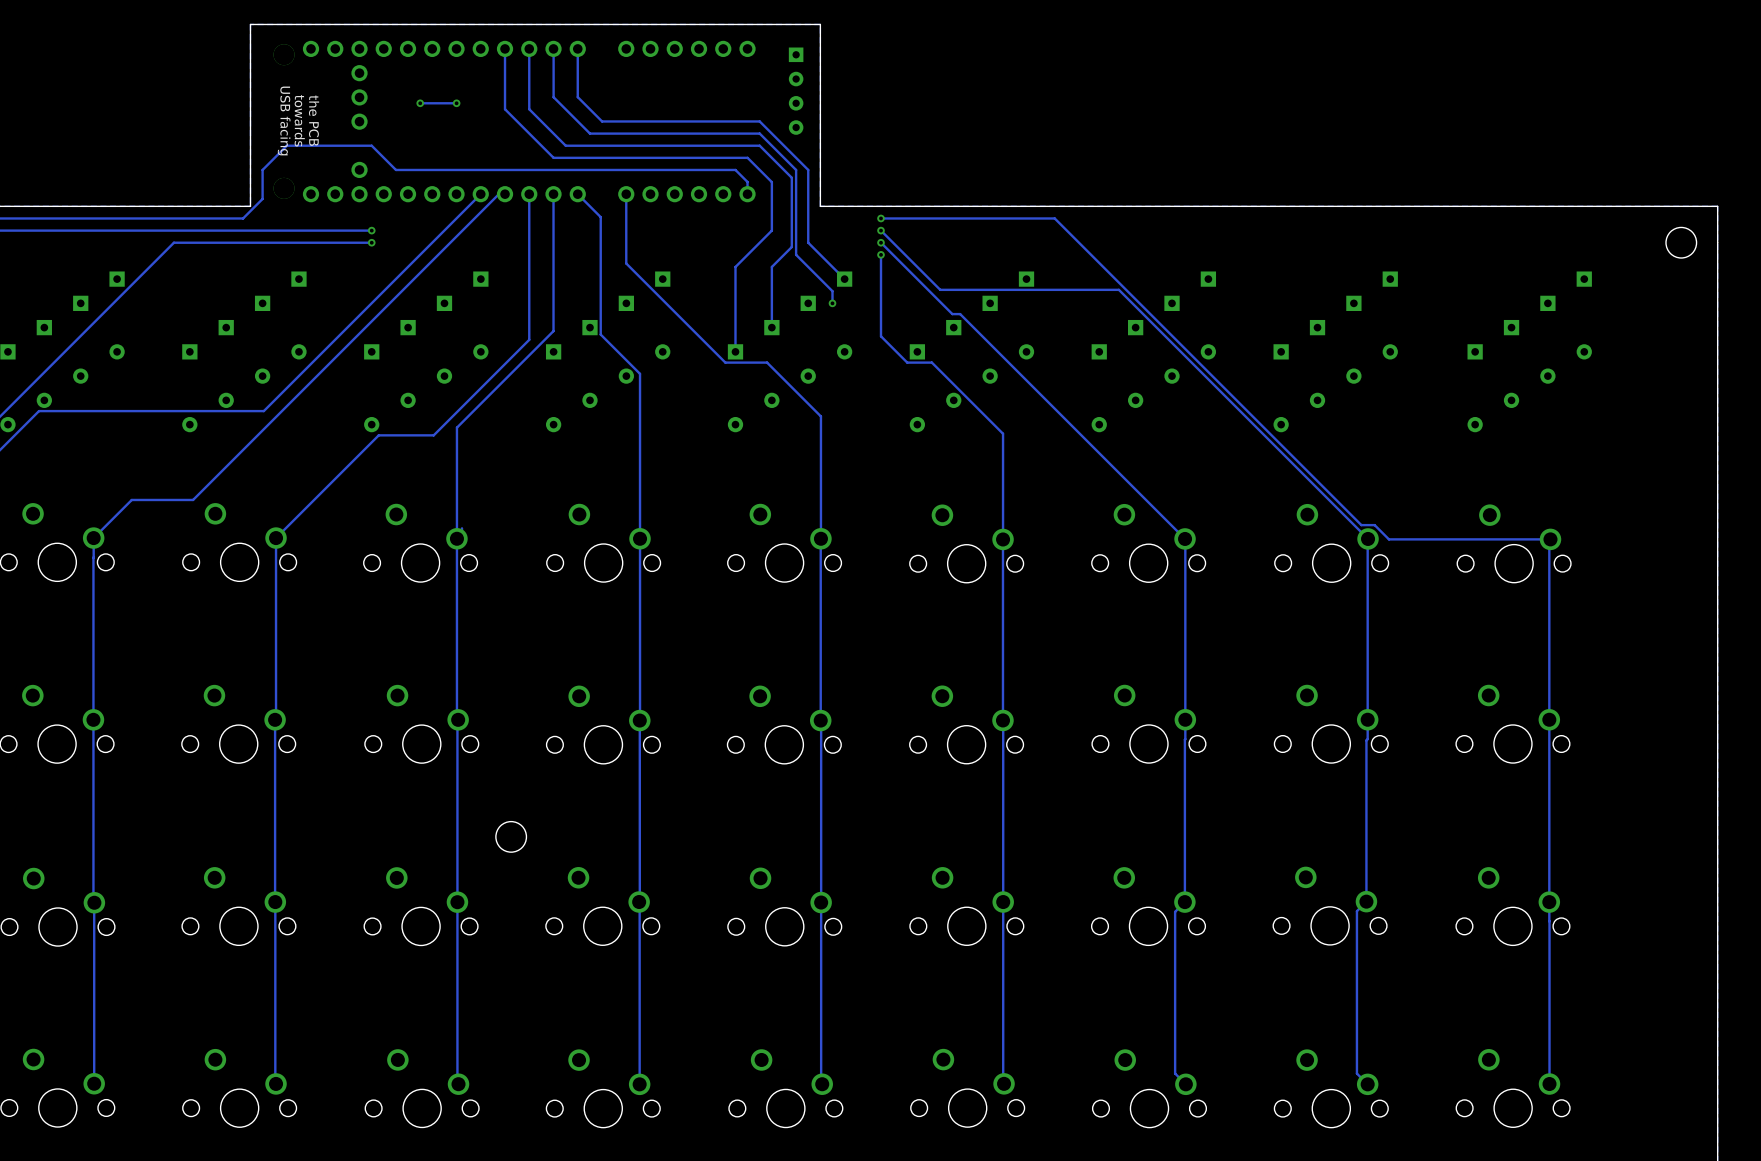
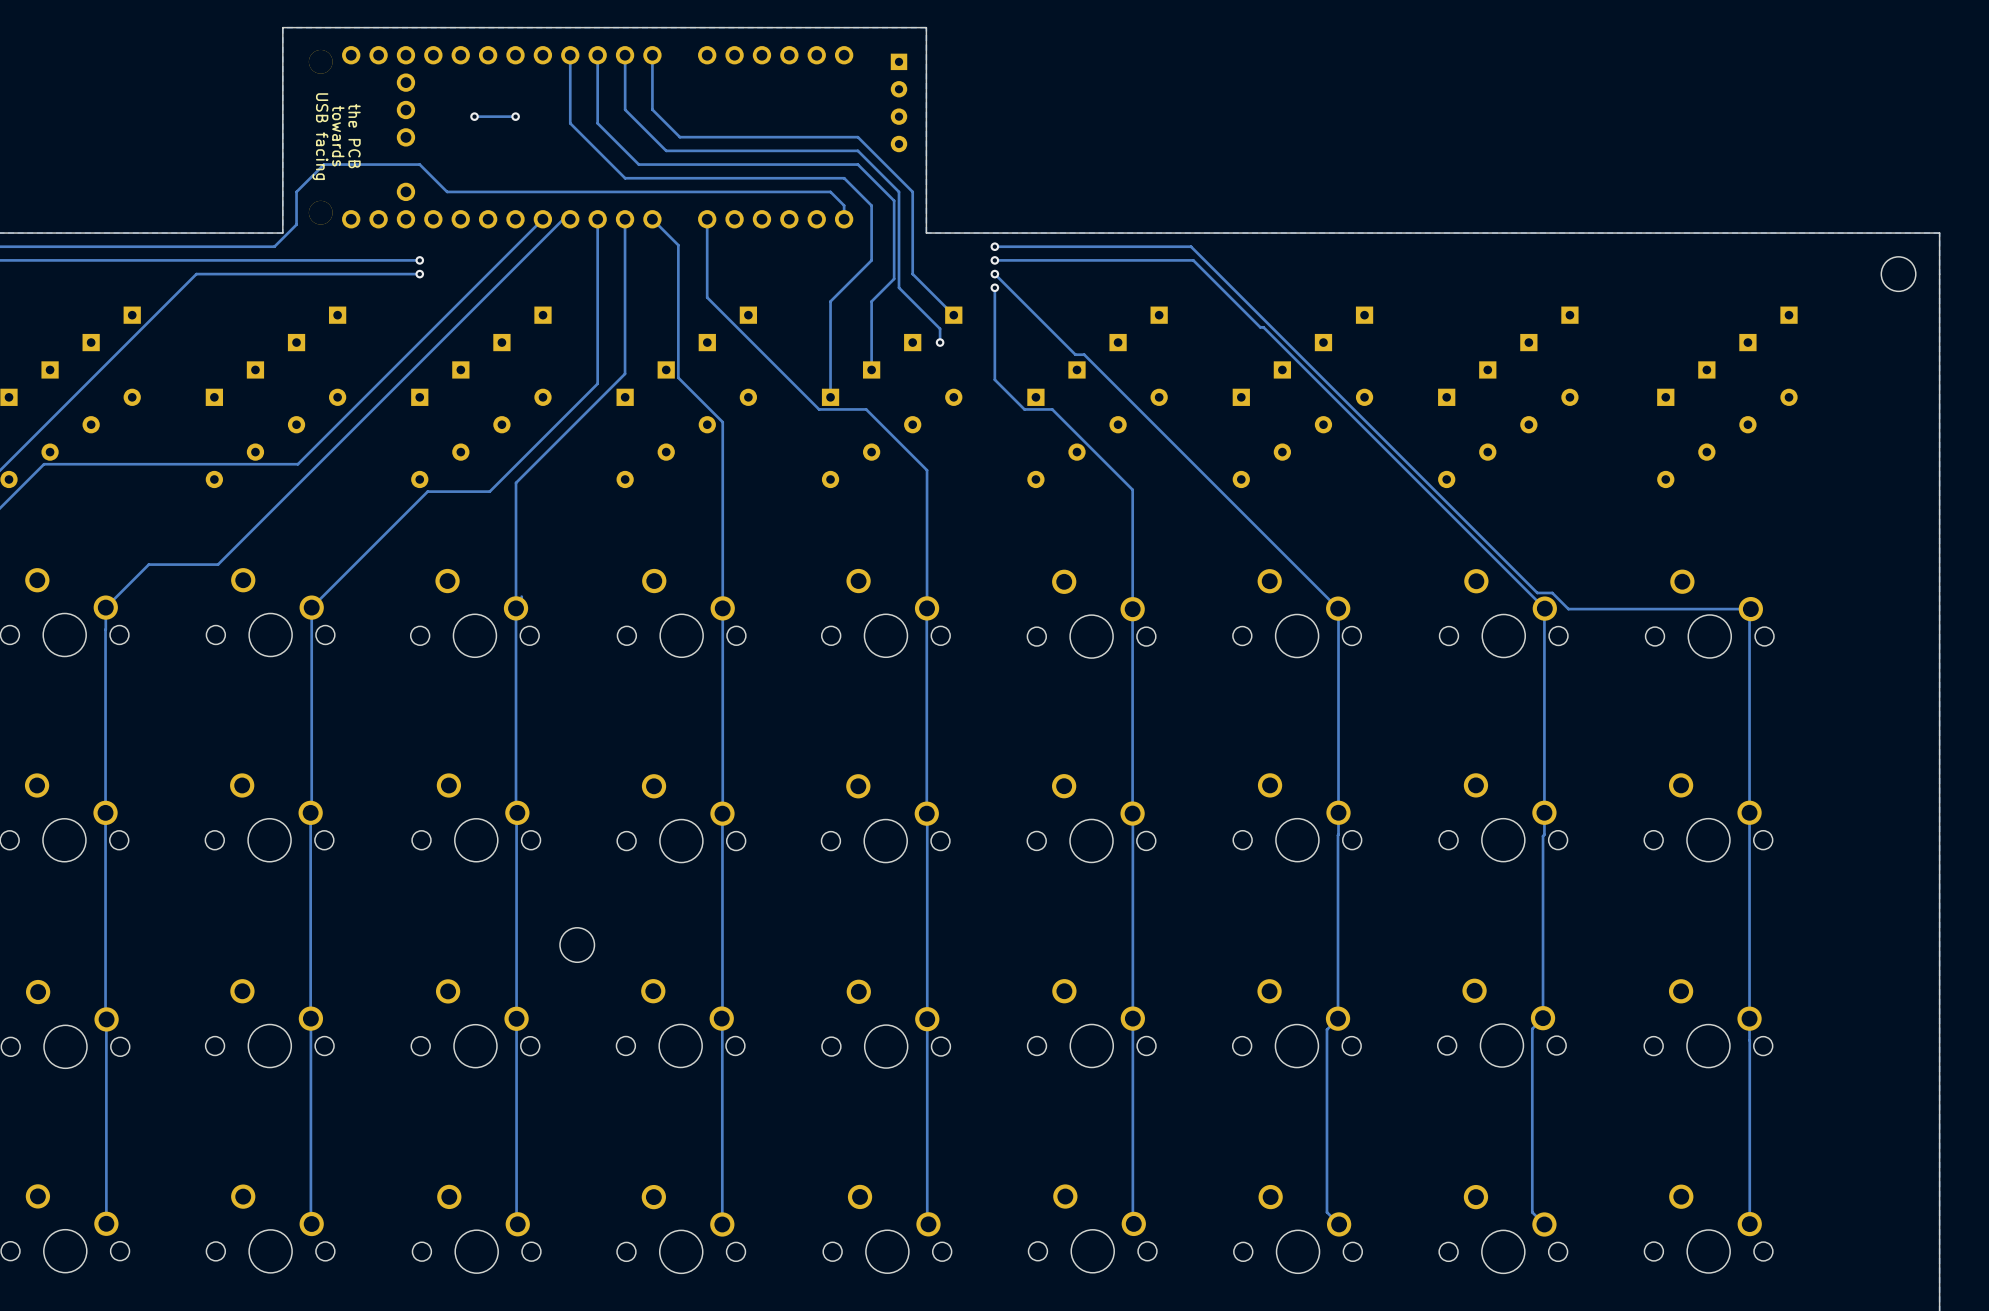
track: (881, 230) (940, 289) (1116, 289) -> (994, 260) (1193, 260) (1260, 327)

